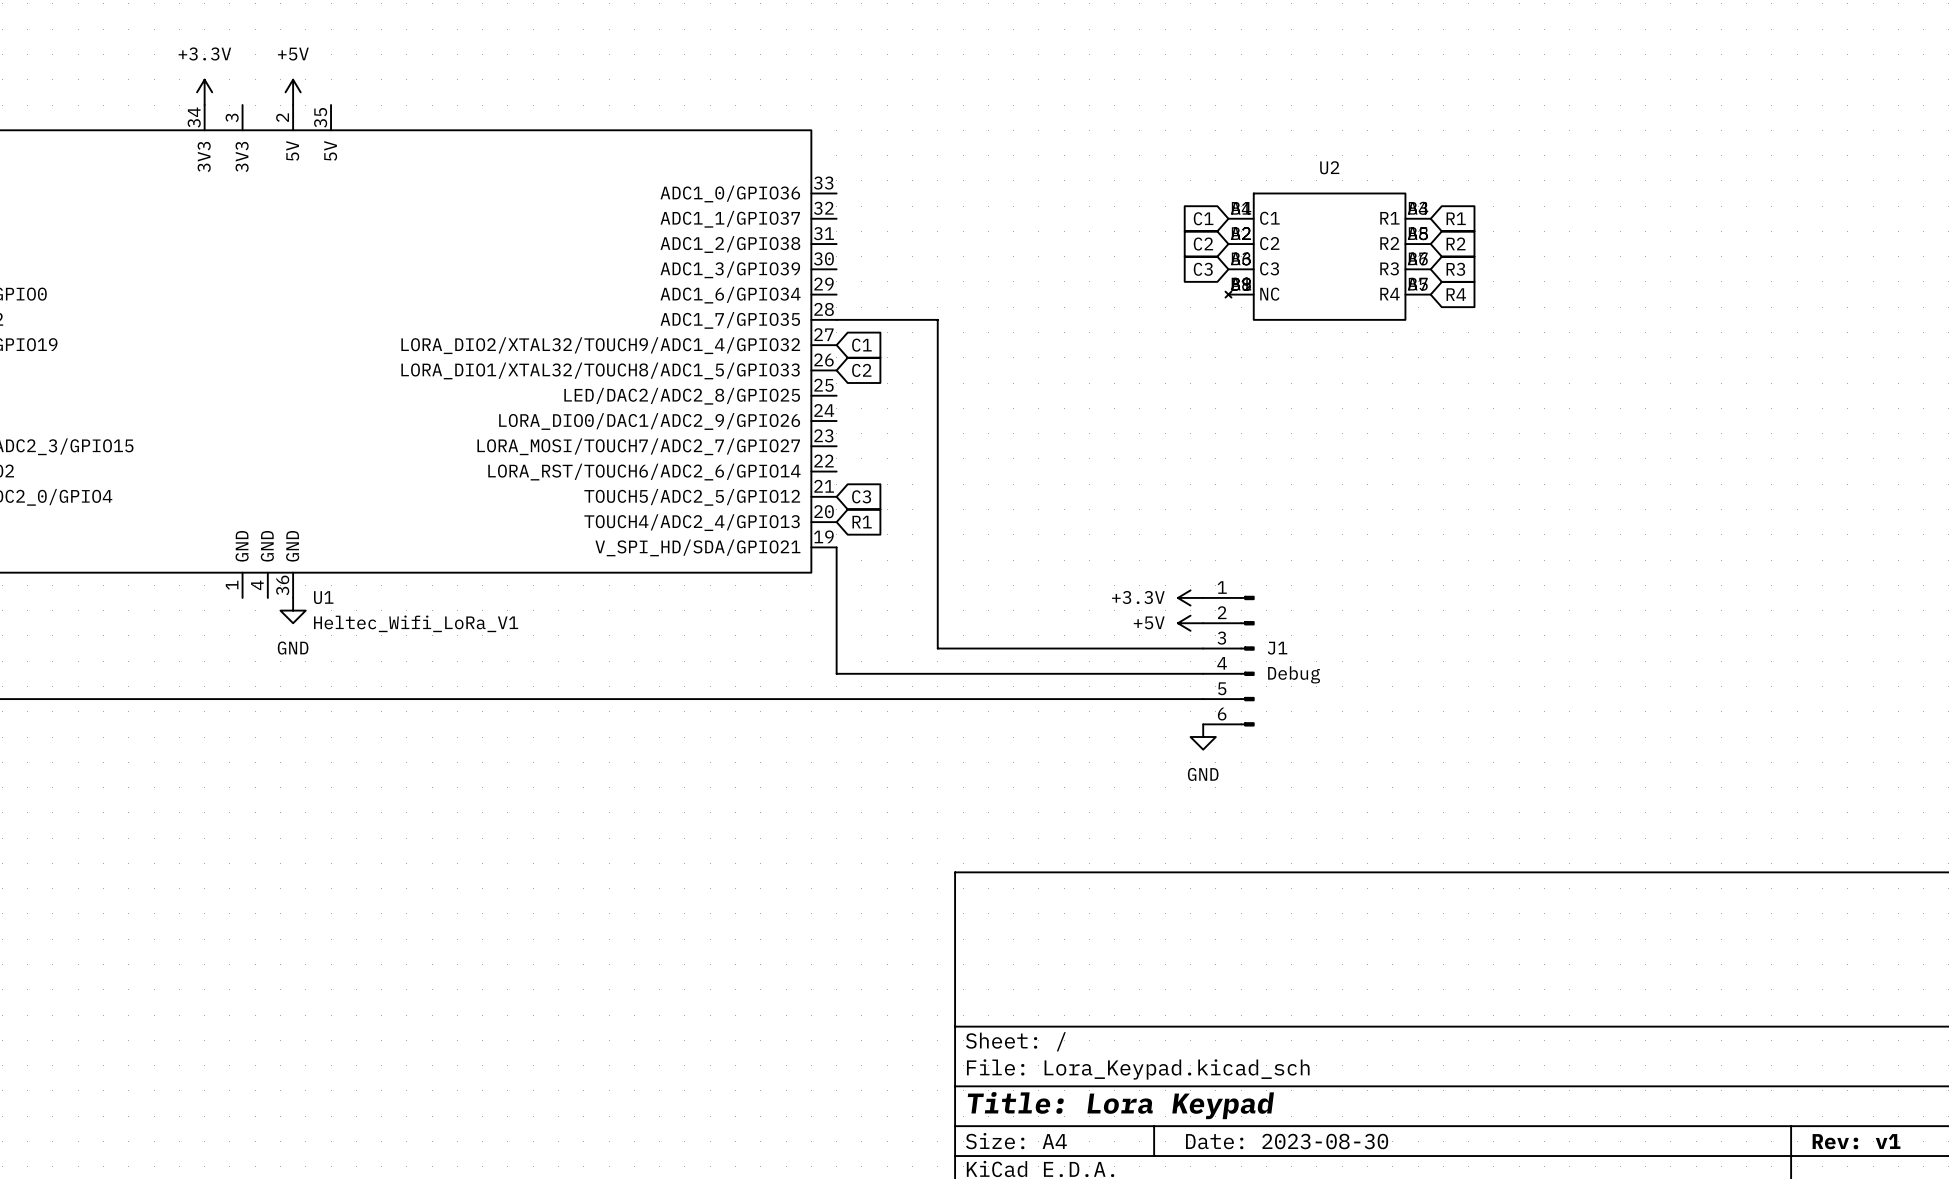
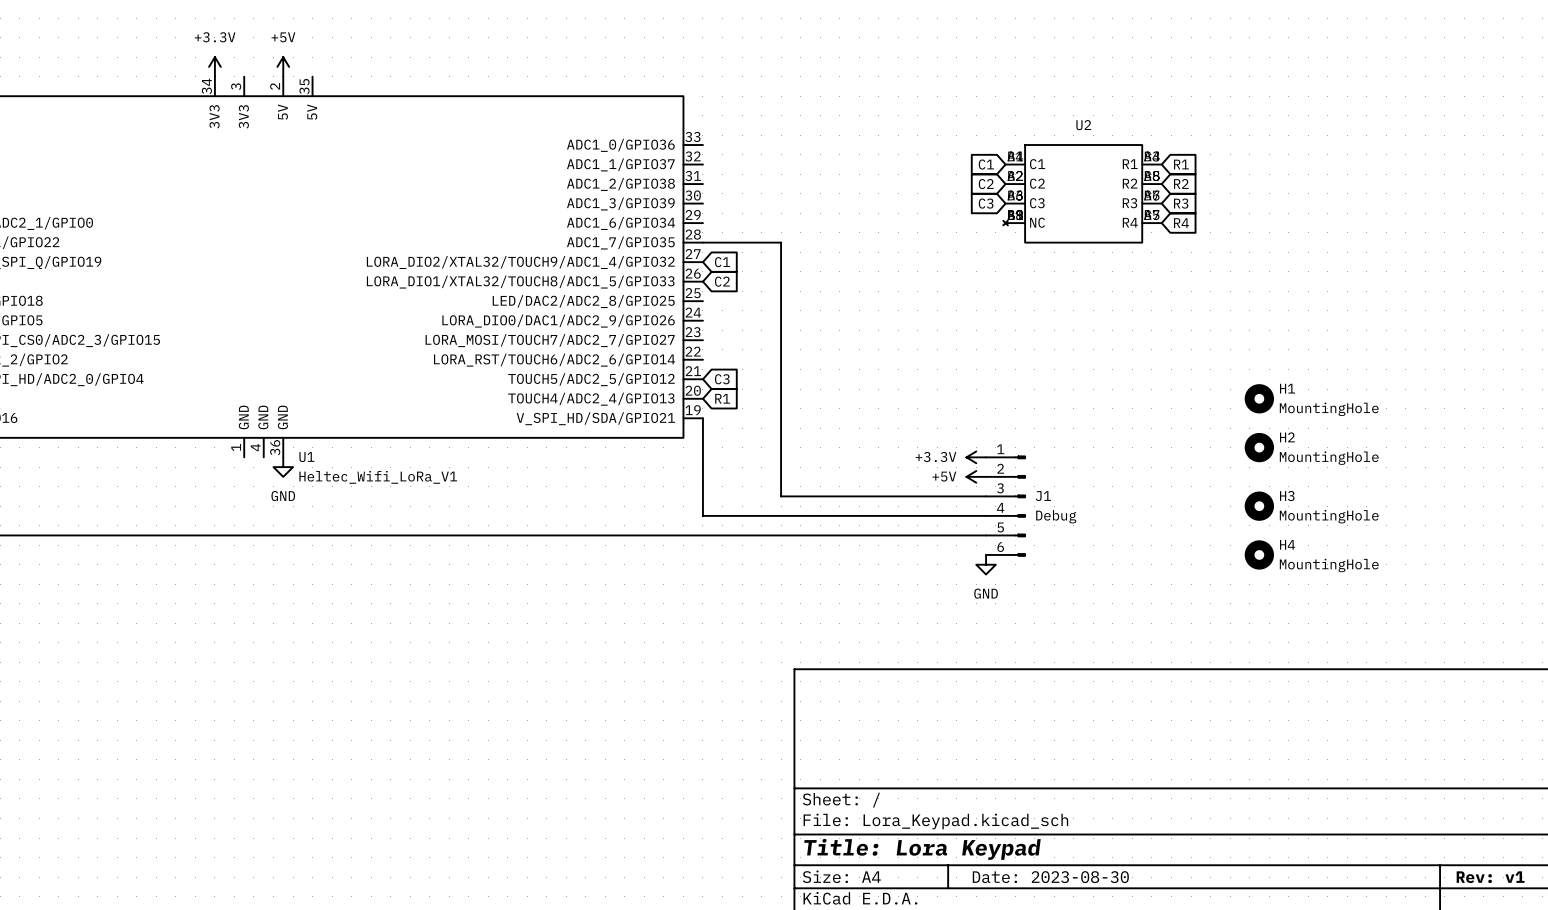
H1: none -> MountingHole (1259, 398)
H2: none -> MountingHole (1259, 447)
H3: none -> MountingHole (1259, 506)
H4: none -> MountingHole (1259, 554)

